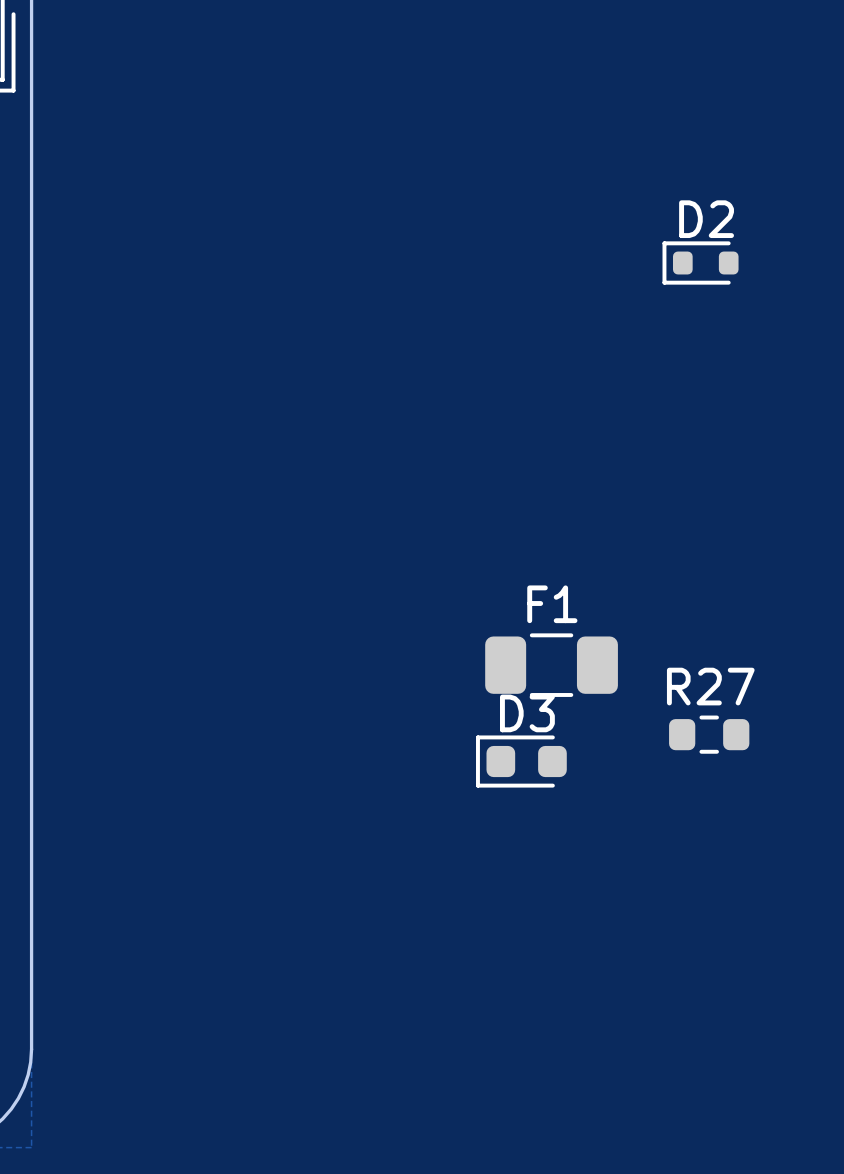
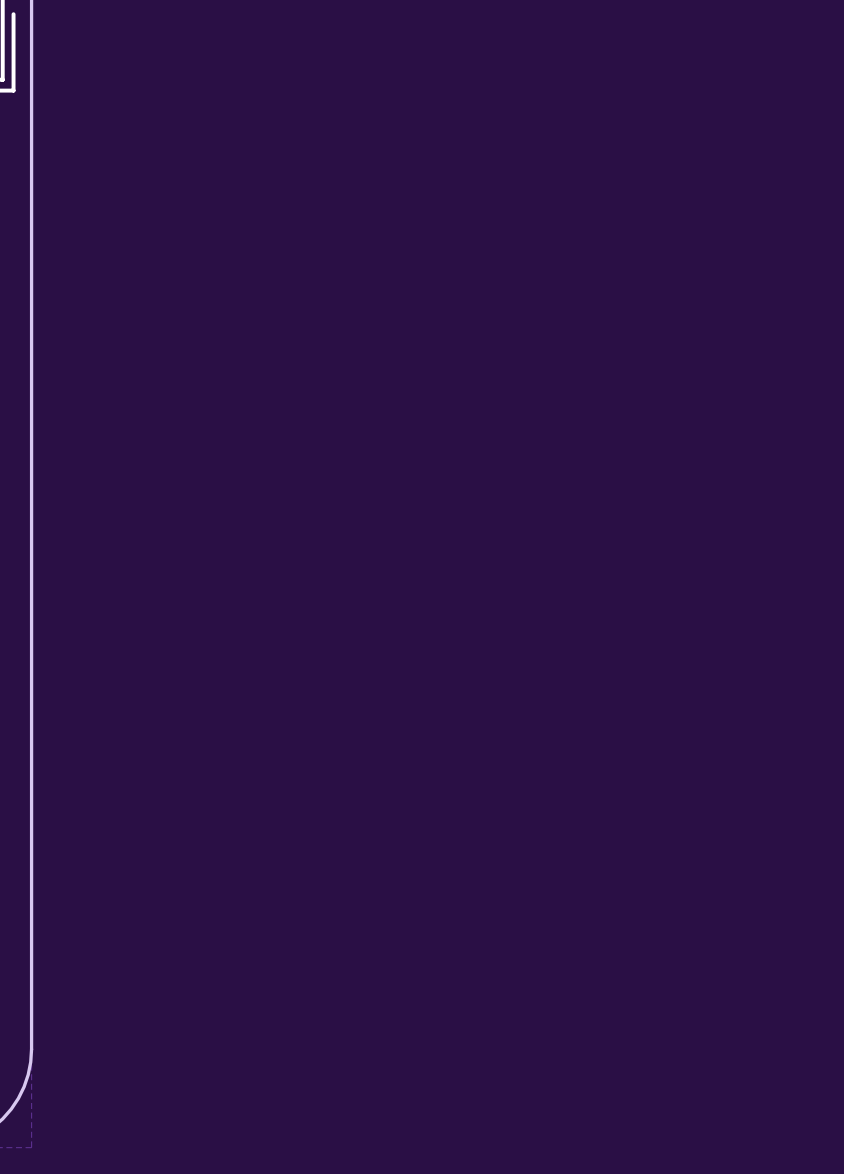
D2: (700, 263) -> none
F1: (551, 665) -> none
R27: (709, 734) -> none
D3: (521, 761) -> none

